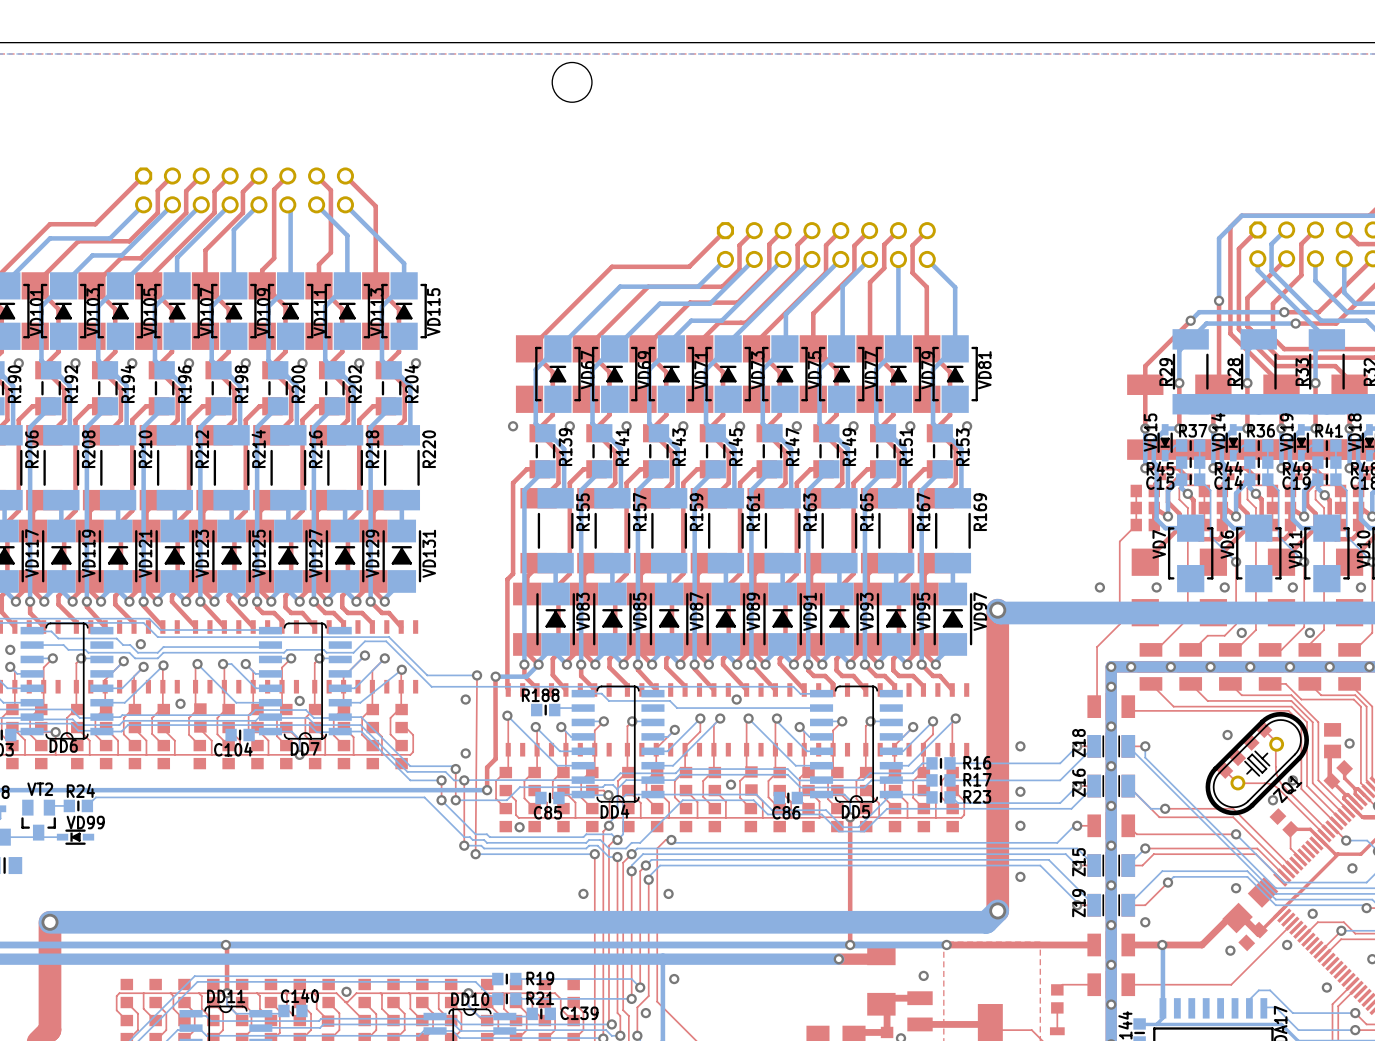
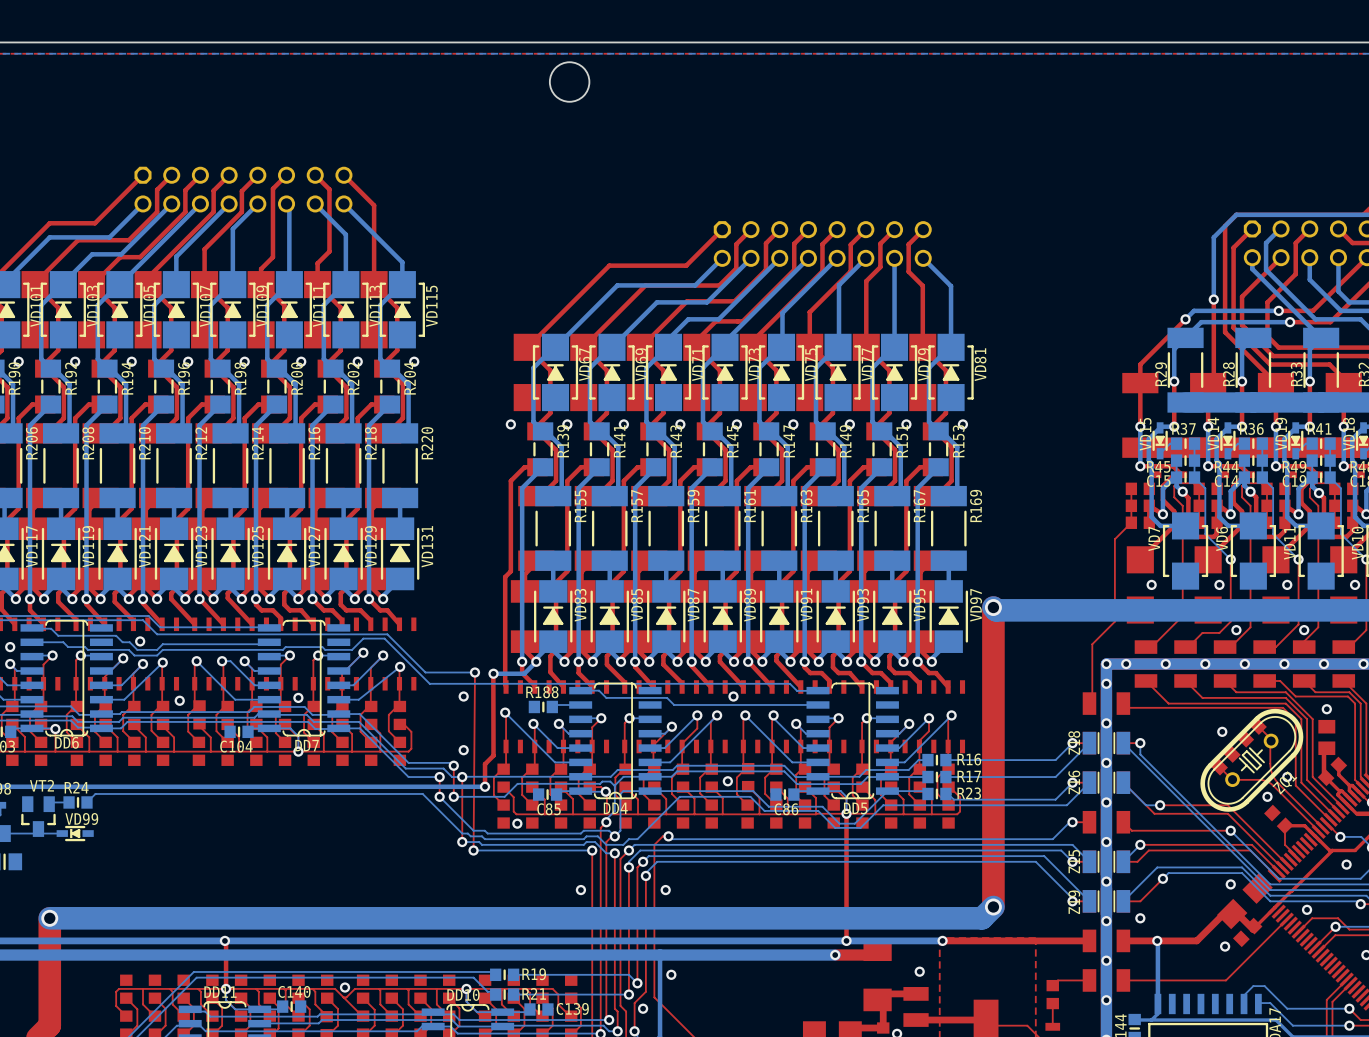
via: (1099, 587) -> none
via: none -> (1326, 709)
via: (1349, 743) -> none
via: (1020, 746) -> none
via: (1020, 791) -> none
via: (1020, 825) -> none
via: (1020, 876) -> none
via: (1287, 944) -> none
via: (1326, 987) -> none

